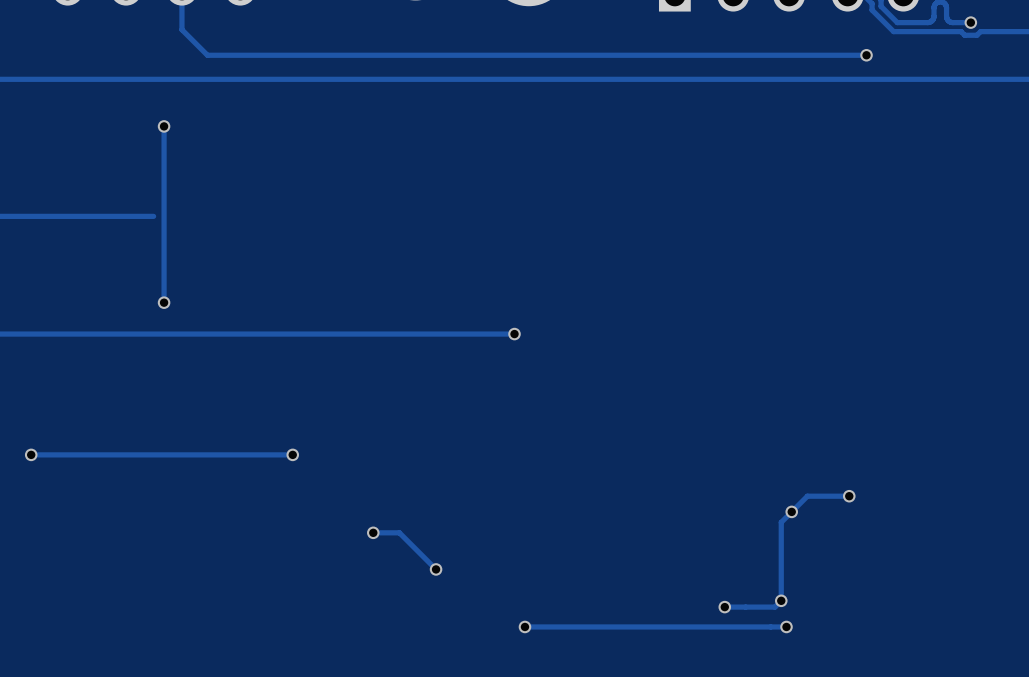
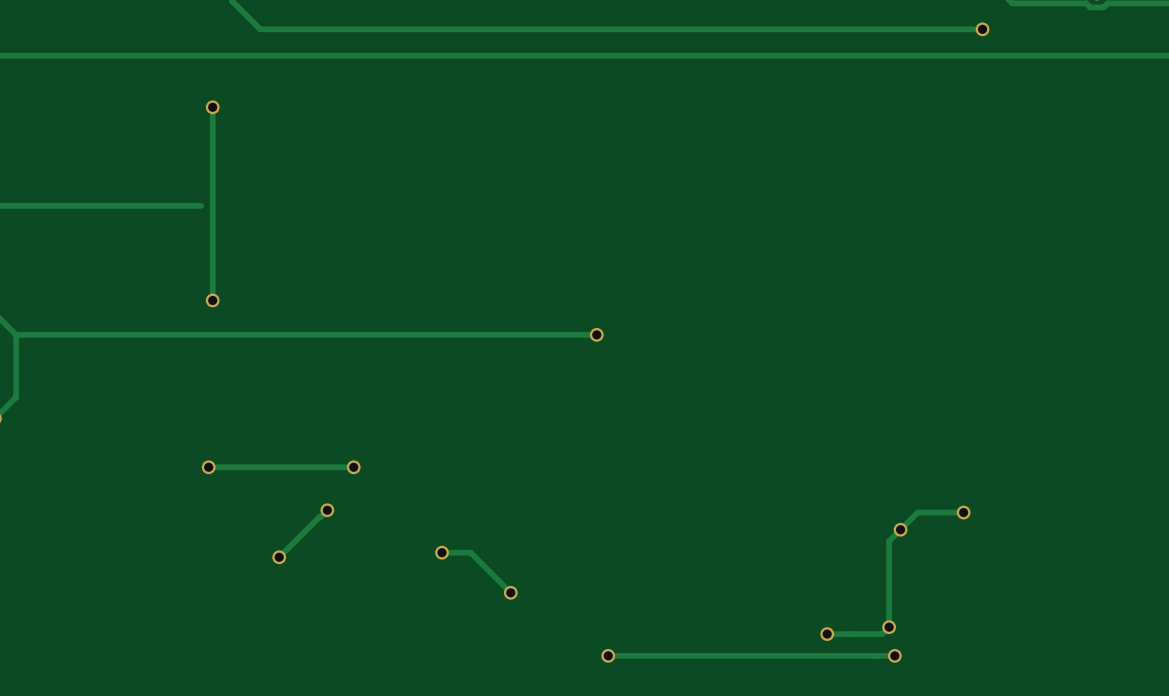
via: (31, 454) -> none
track: (160, 454) (31, 454) -> none
via: none -> (208, 467)
track: none -> (327, 510) (279, 557)
via: none -> (327, 510)
via: none -> (279, 557)

